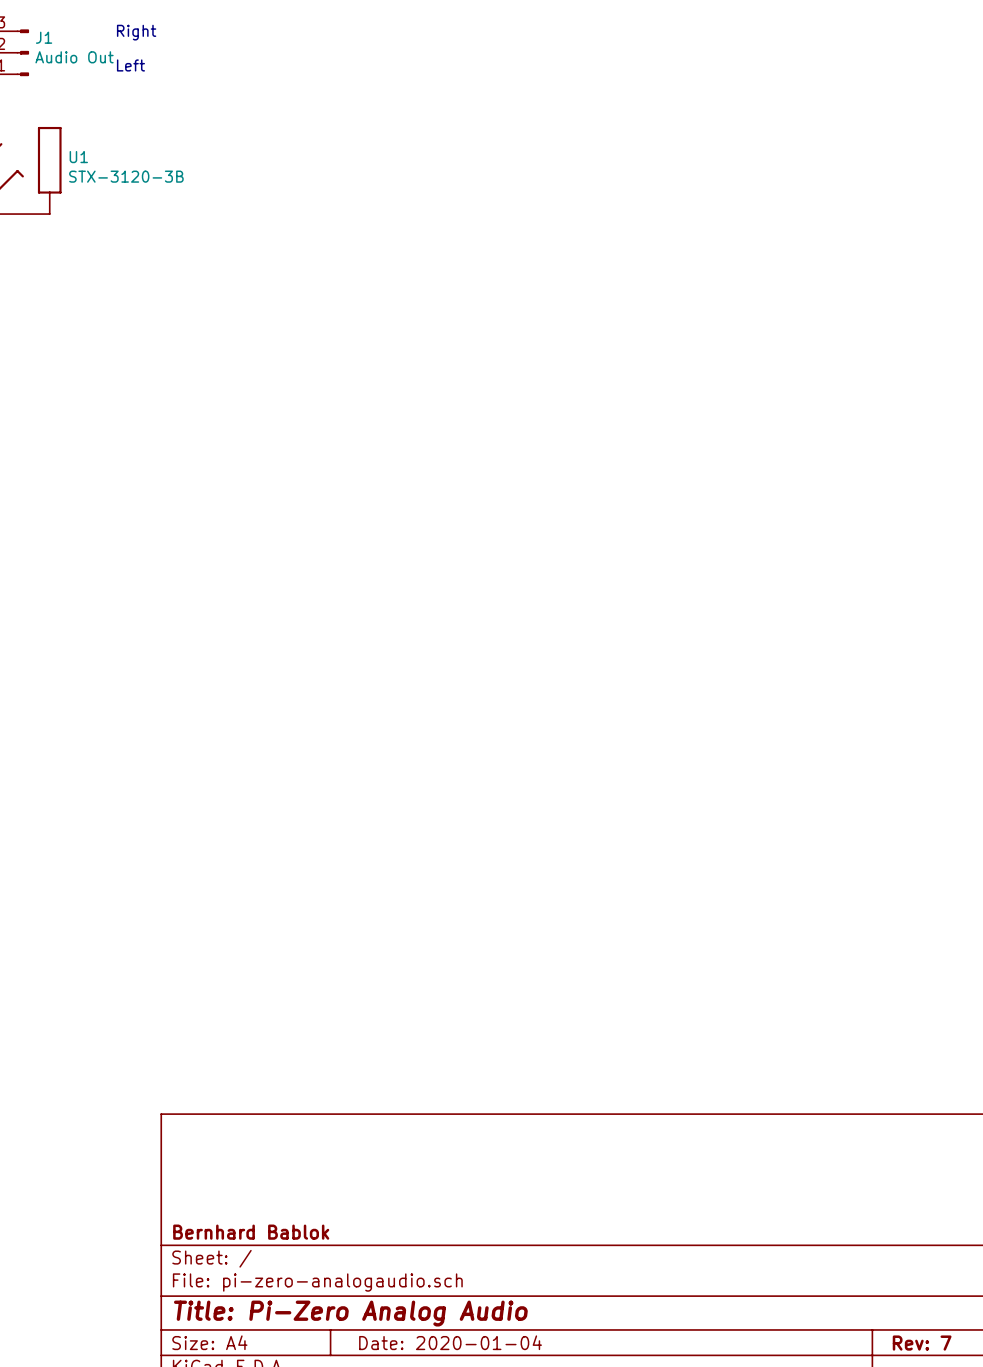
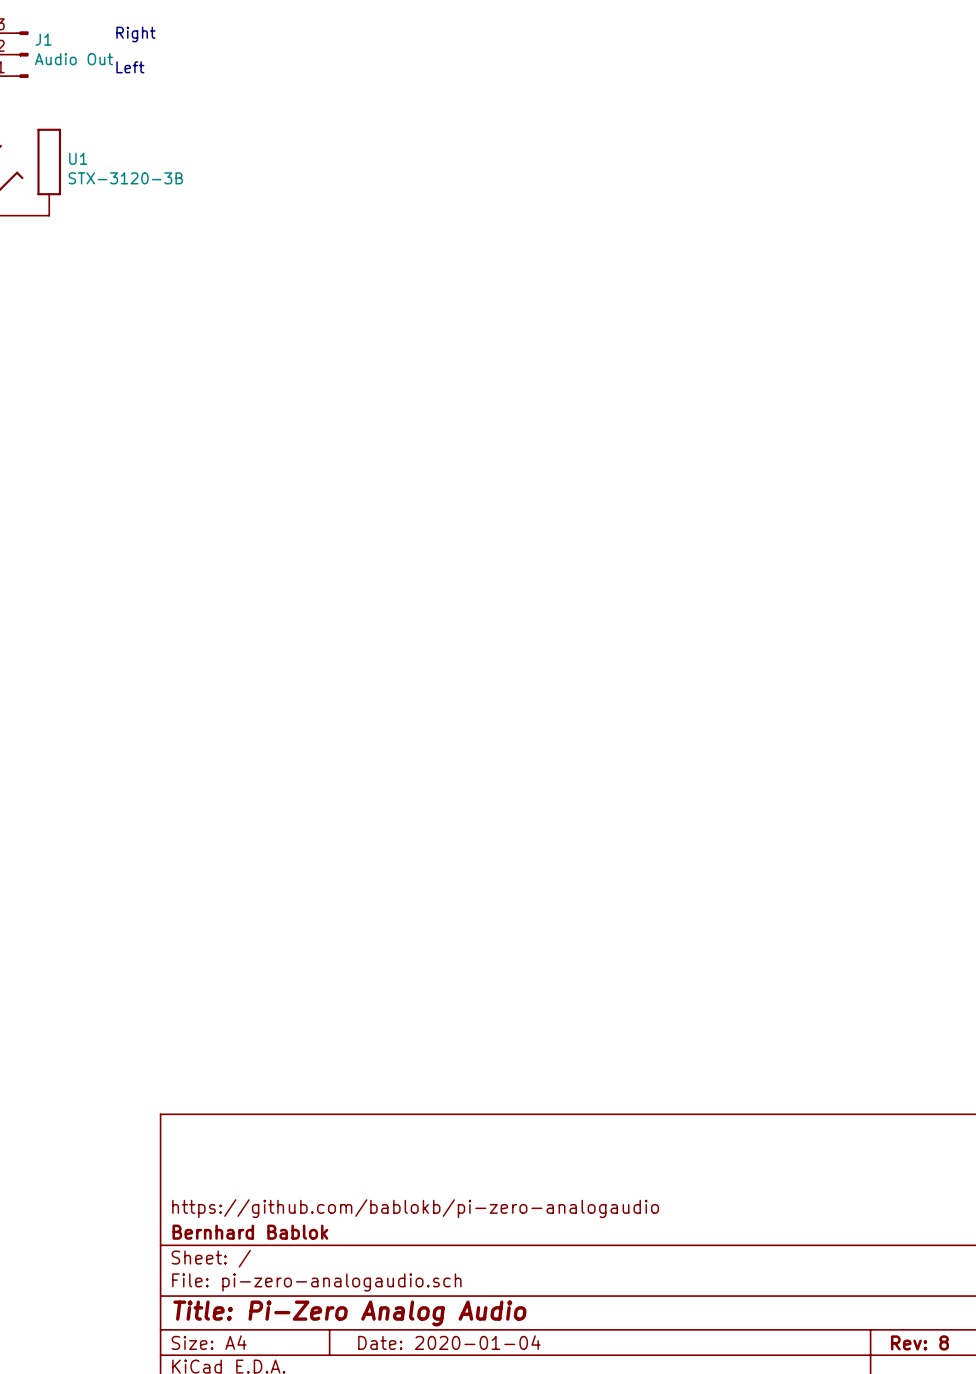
title block: none -> https://github.com/bablokb/pi-zero-analogaudio (415, 1208)
title block: Rev: 7 (922, 1343) -> Rev: 8 (919, 1342)

